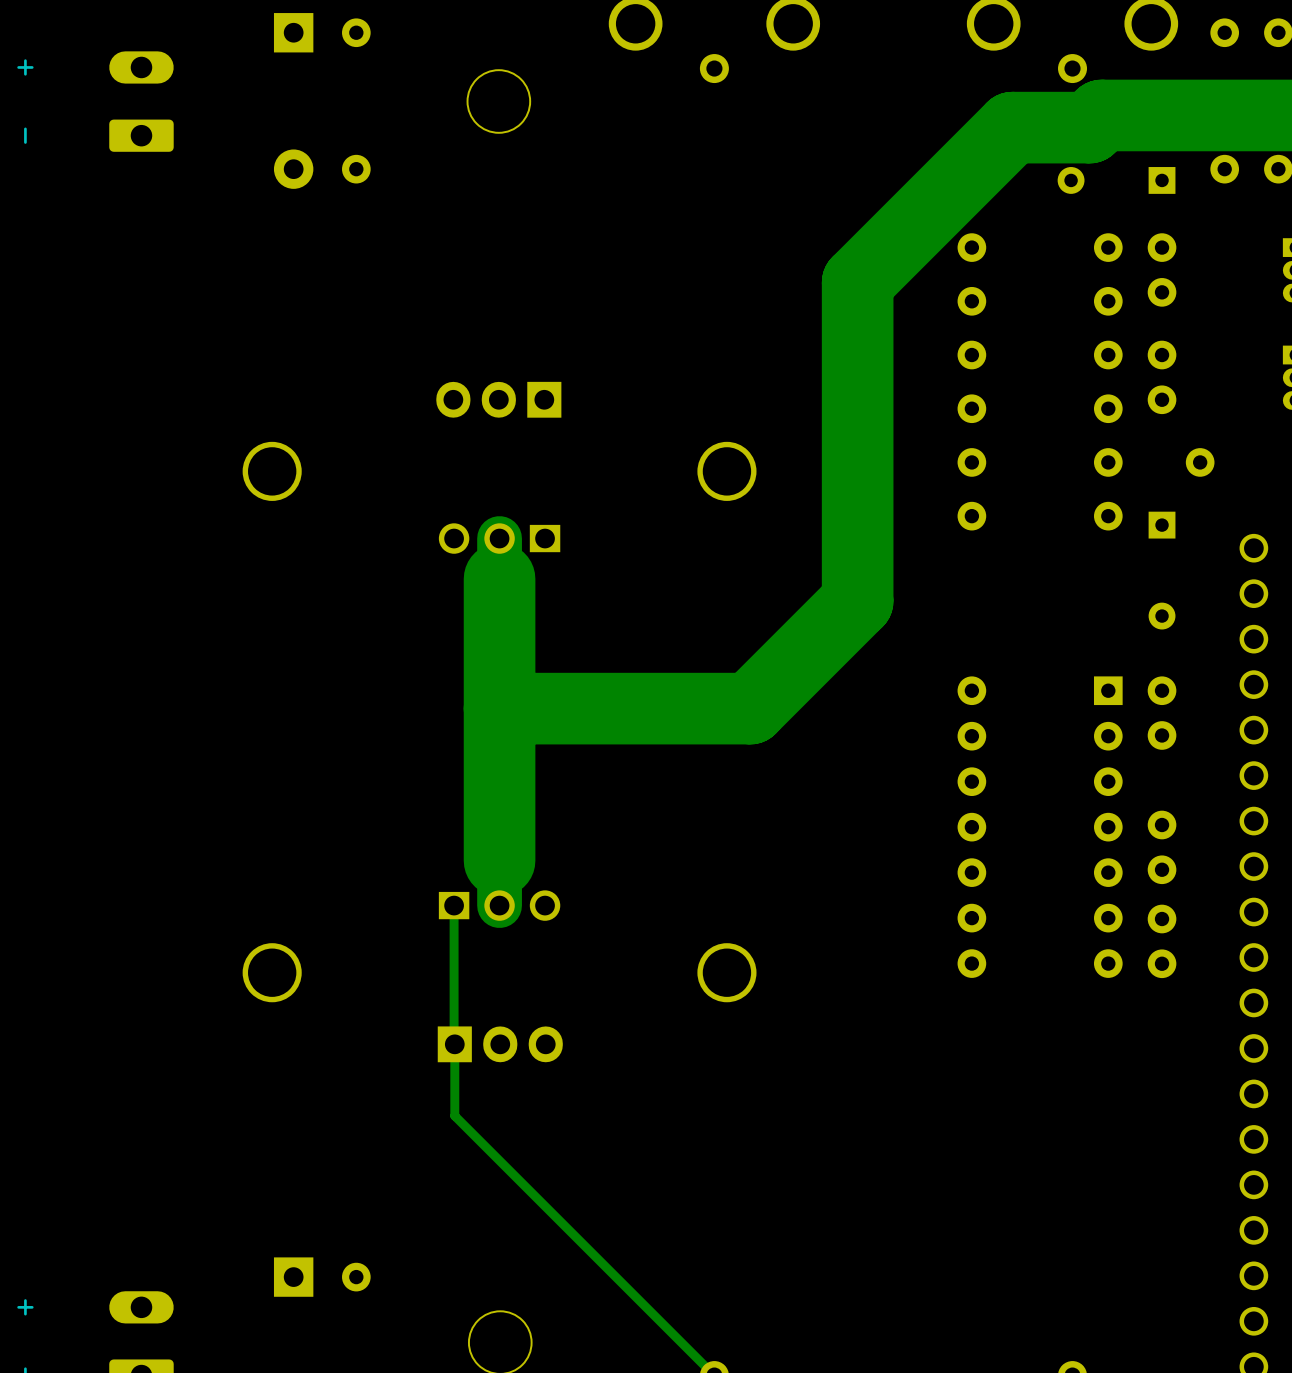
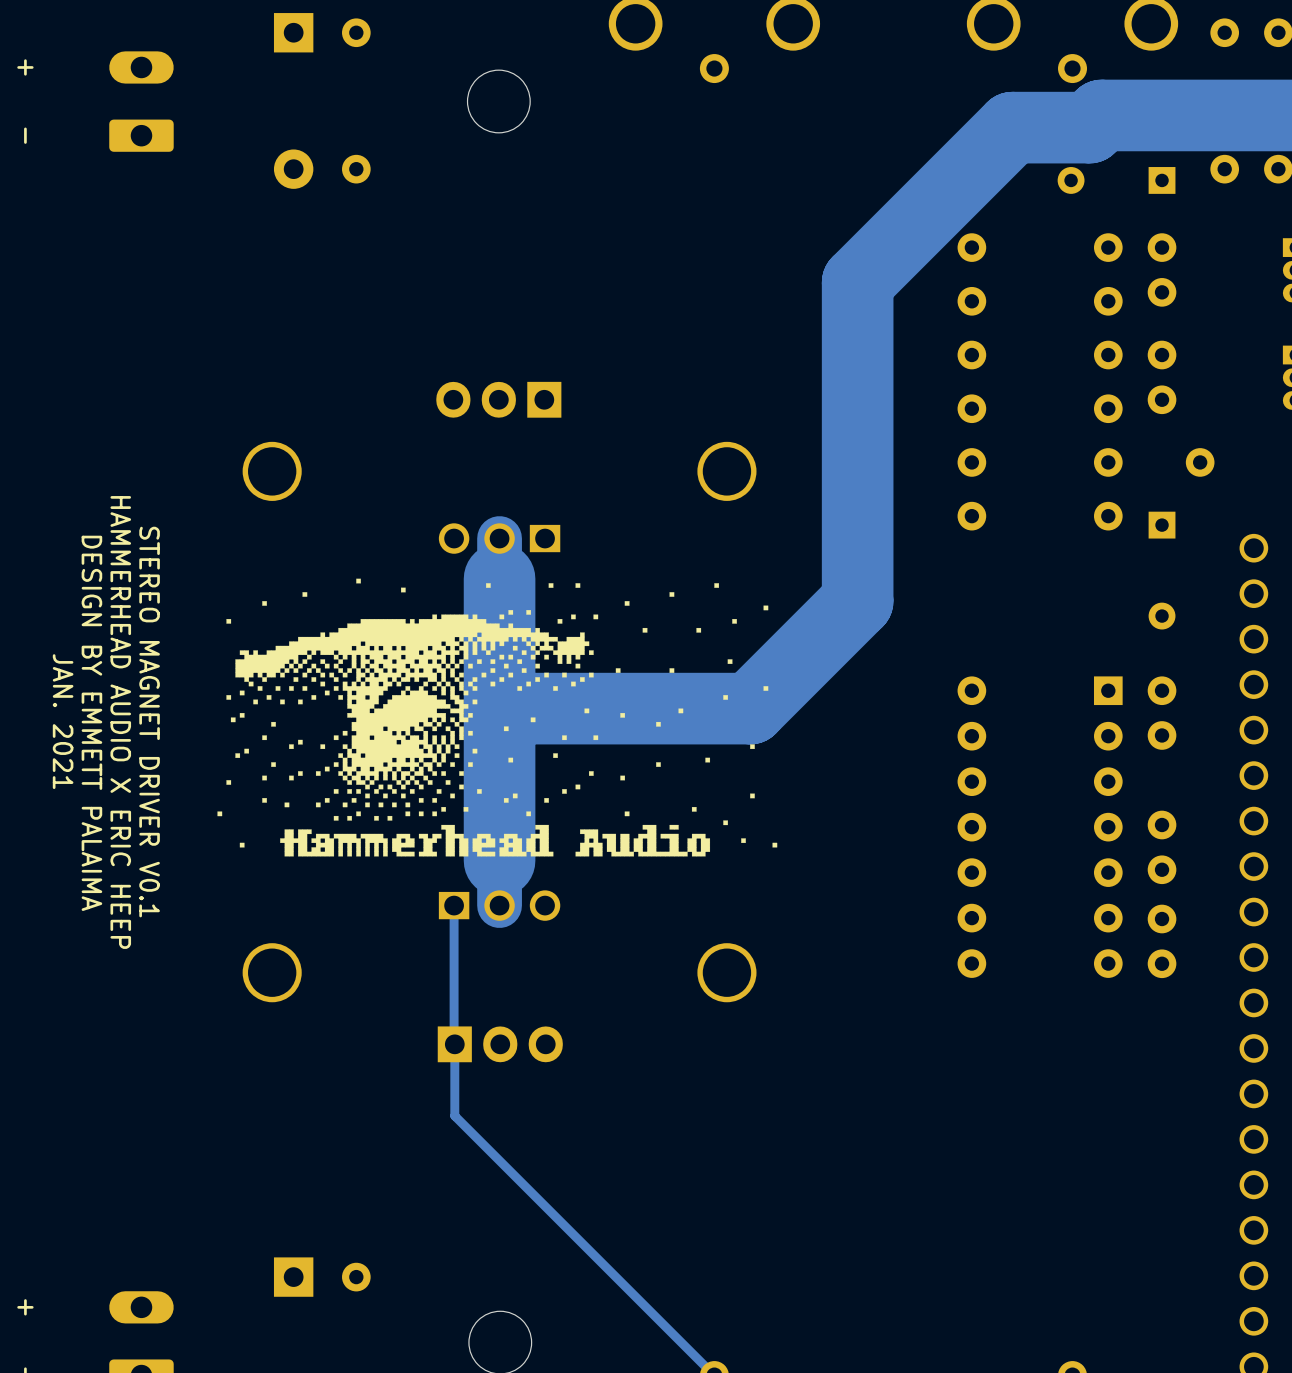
drawing: none -> [217, 578, 778, 857]
text: none -> JAN. 2021 (63, 721)
text: none -> HAMMERHEAD AUDIO X ERIC HEEP (120, 722)
text: none -> STEREO MAGNET DRIVER V0.1 (149, 722)
text: none -> DESIGN BY EMMETT PALAIMA (91, 723)

